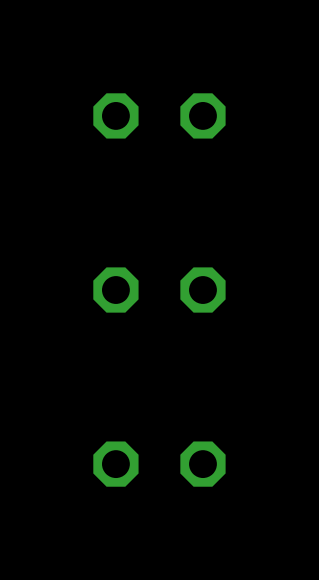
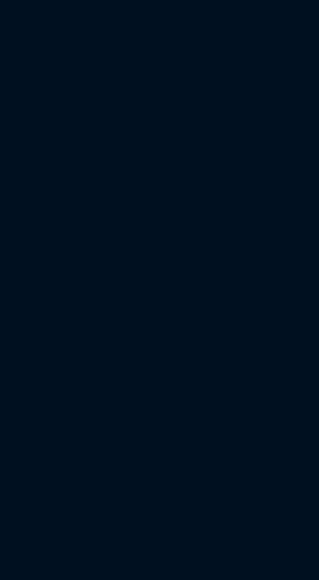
part: (159, 115) -> none
part: (159, 290) -> none
part: (159, 464) -> none

